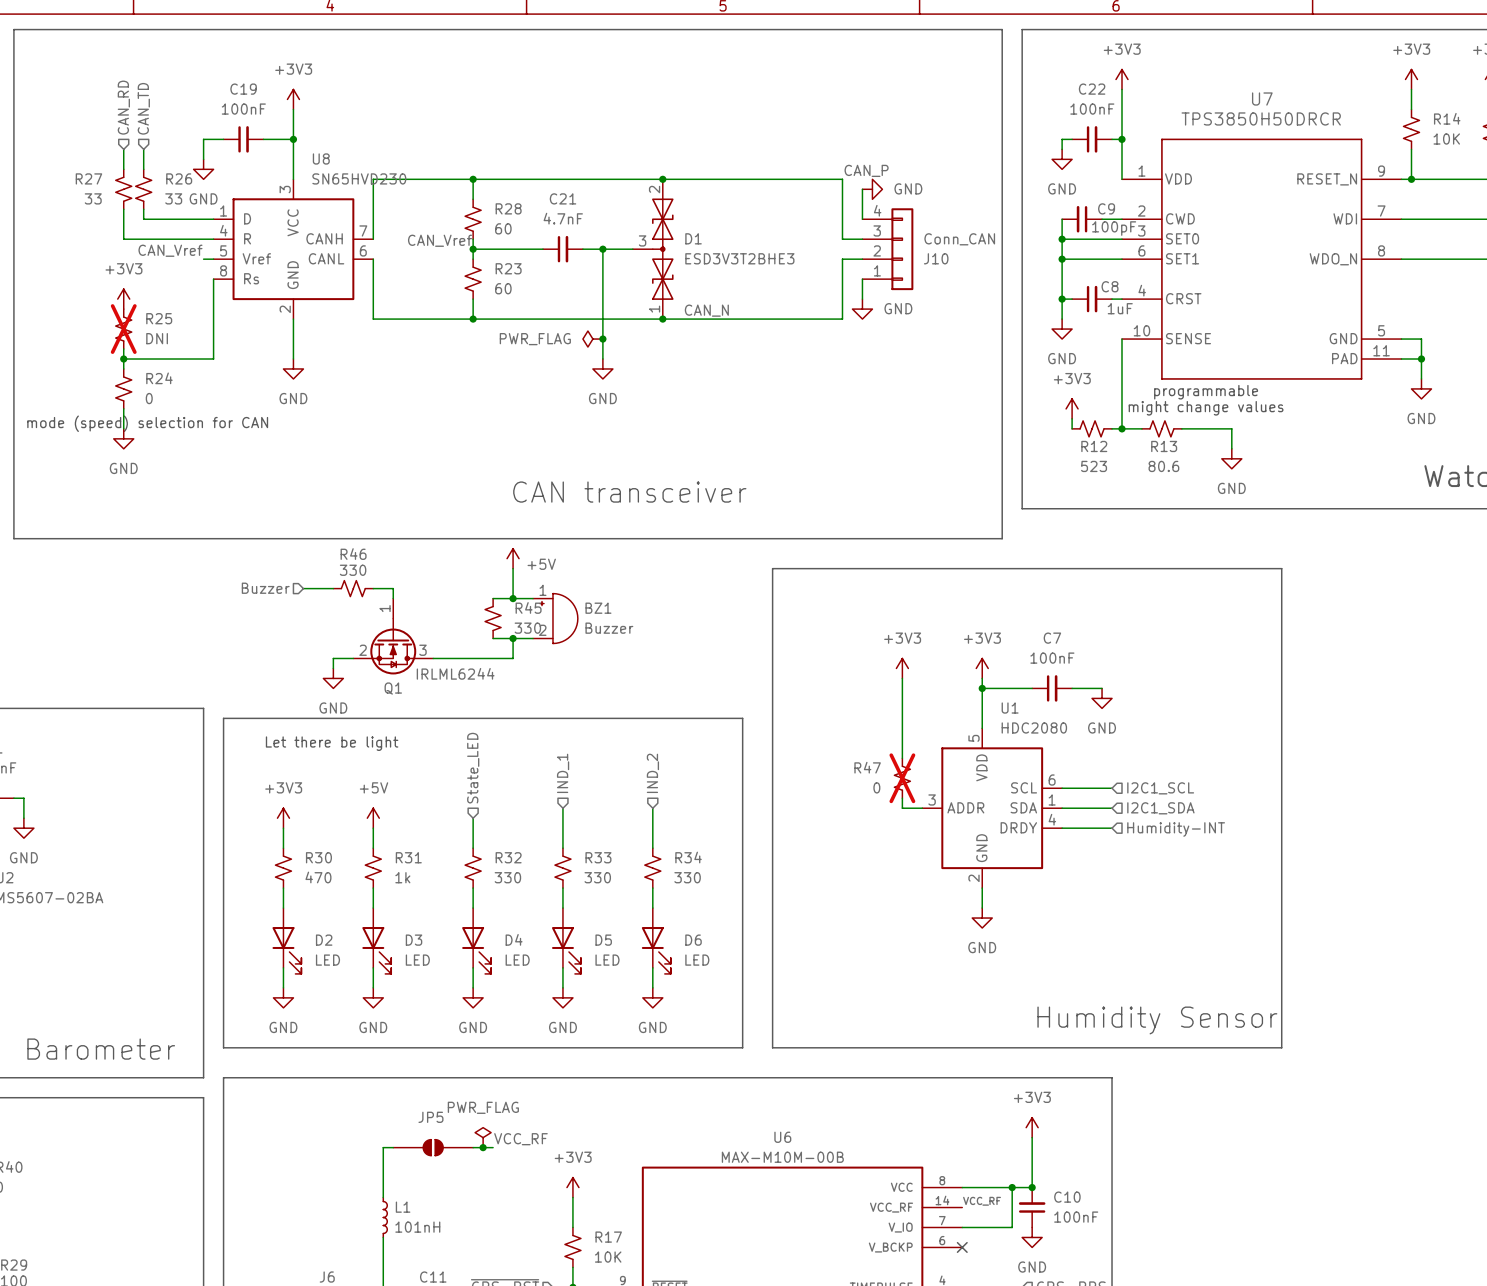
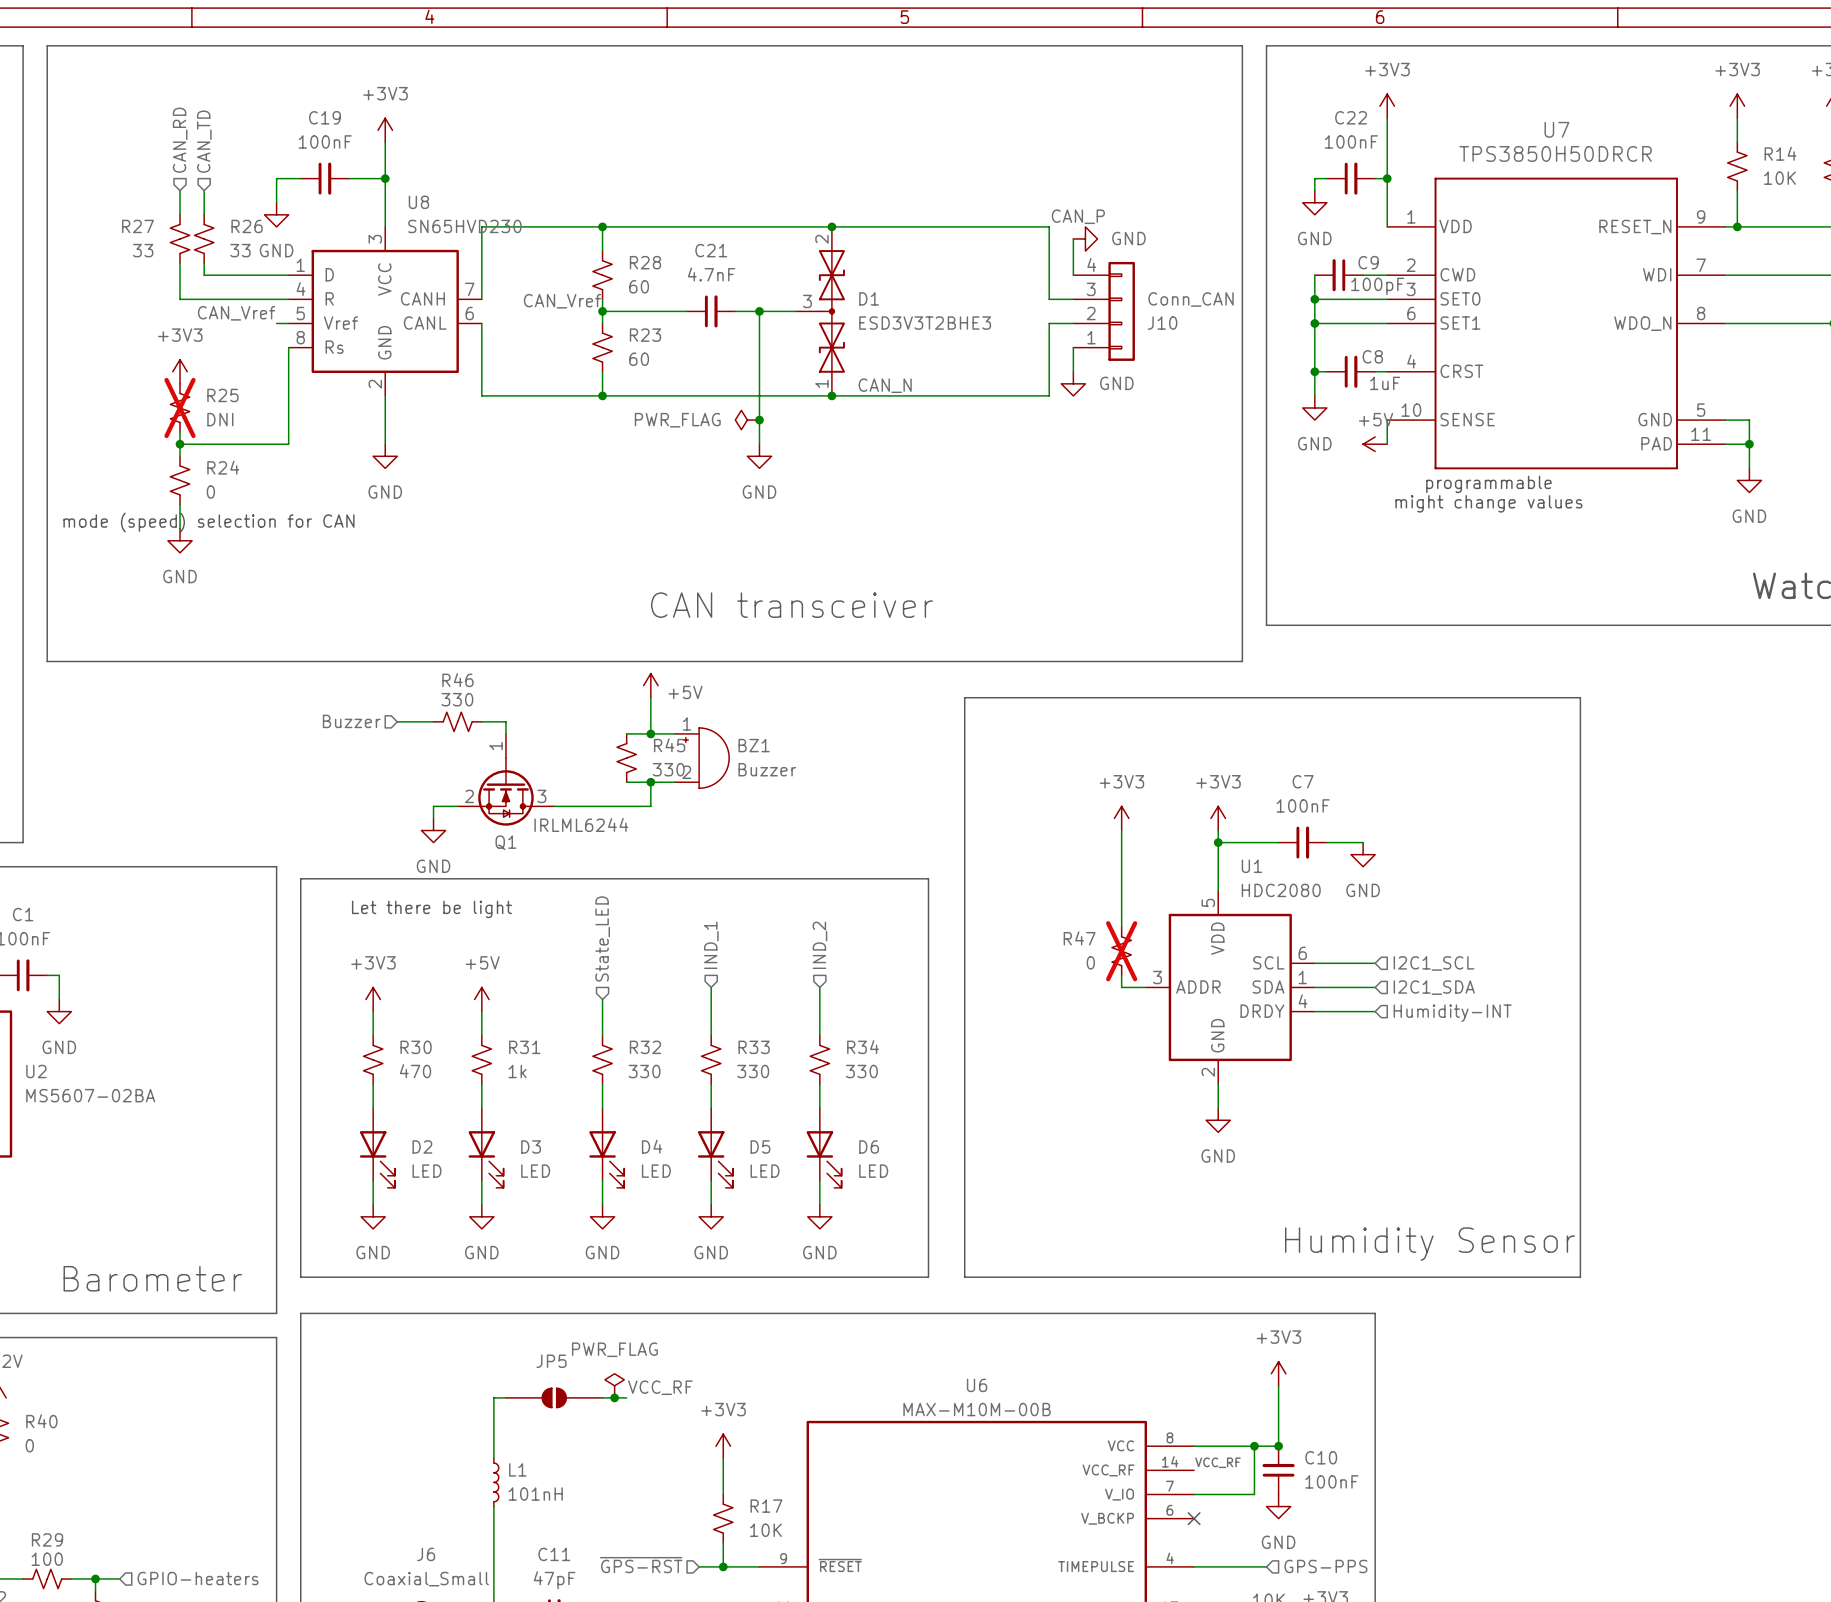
power symbol: none -> +5V (1375, 444)
wire: (1122, 359) (1122, 428) -> none
power symbol: +3V3 (1072, 408) -> none
wire: (1072, 418) (1072, 428) -> none
R12: 523 (1092, 428) -> none
wire: (1112, 428) (1141, 428) -> none
junction: (1122, 428) -> none
R13: 80.6 (1161, 428) -> none
wire: (1181, 428) (1231, 428) (1231, 448) -> none
power symbol: GND (1231, 458) -> none

